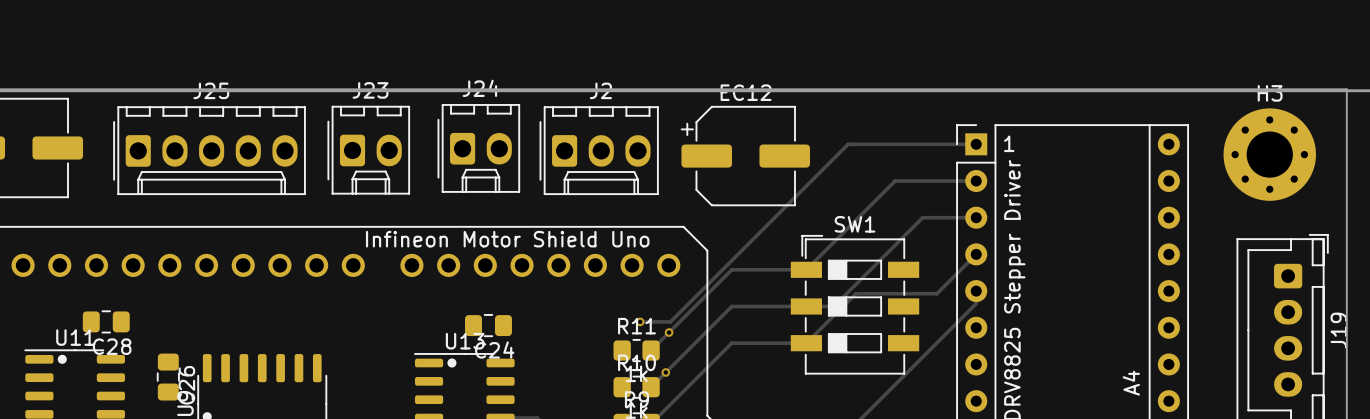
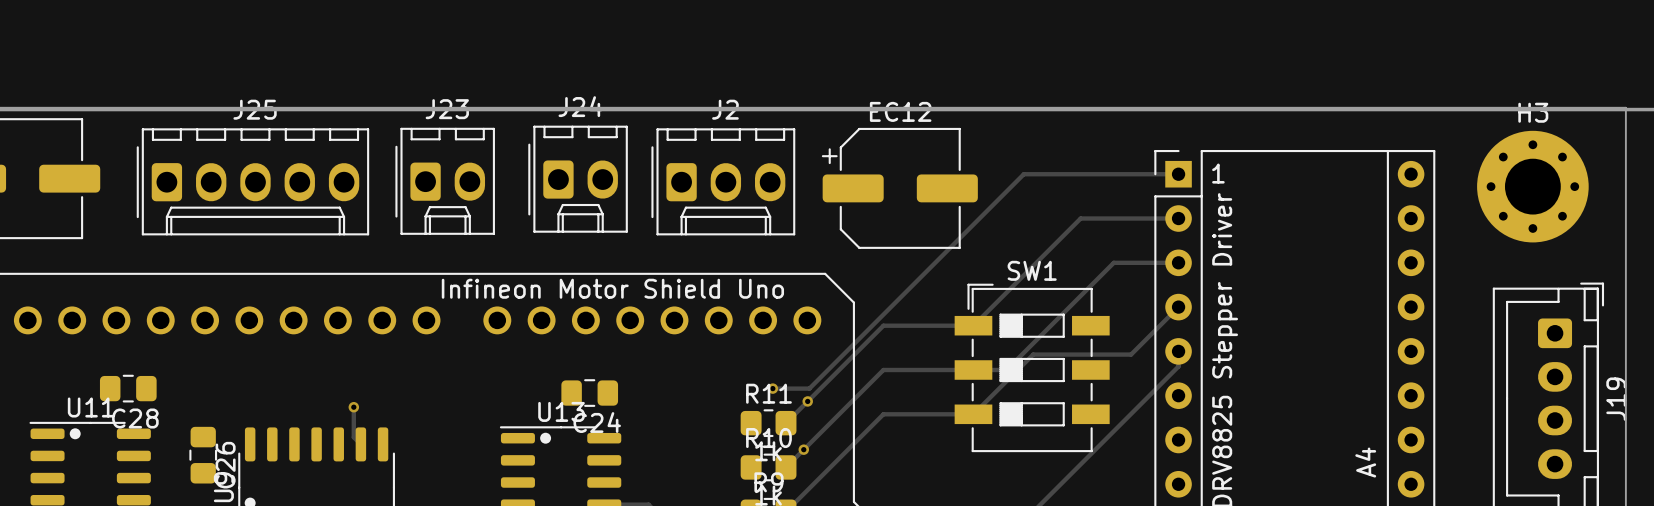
track: none -> (353, 407) (353, 437) (360, 444)
via: none -> (353, 407)

